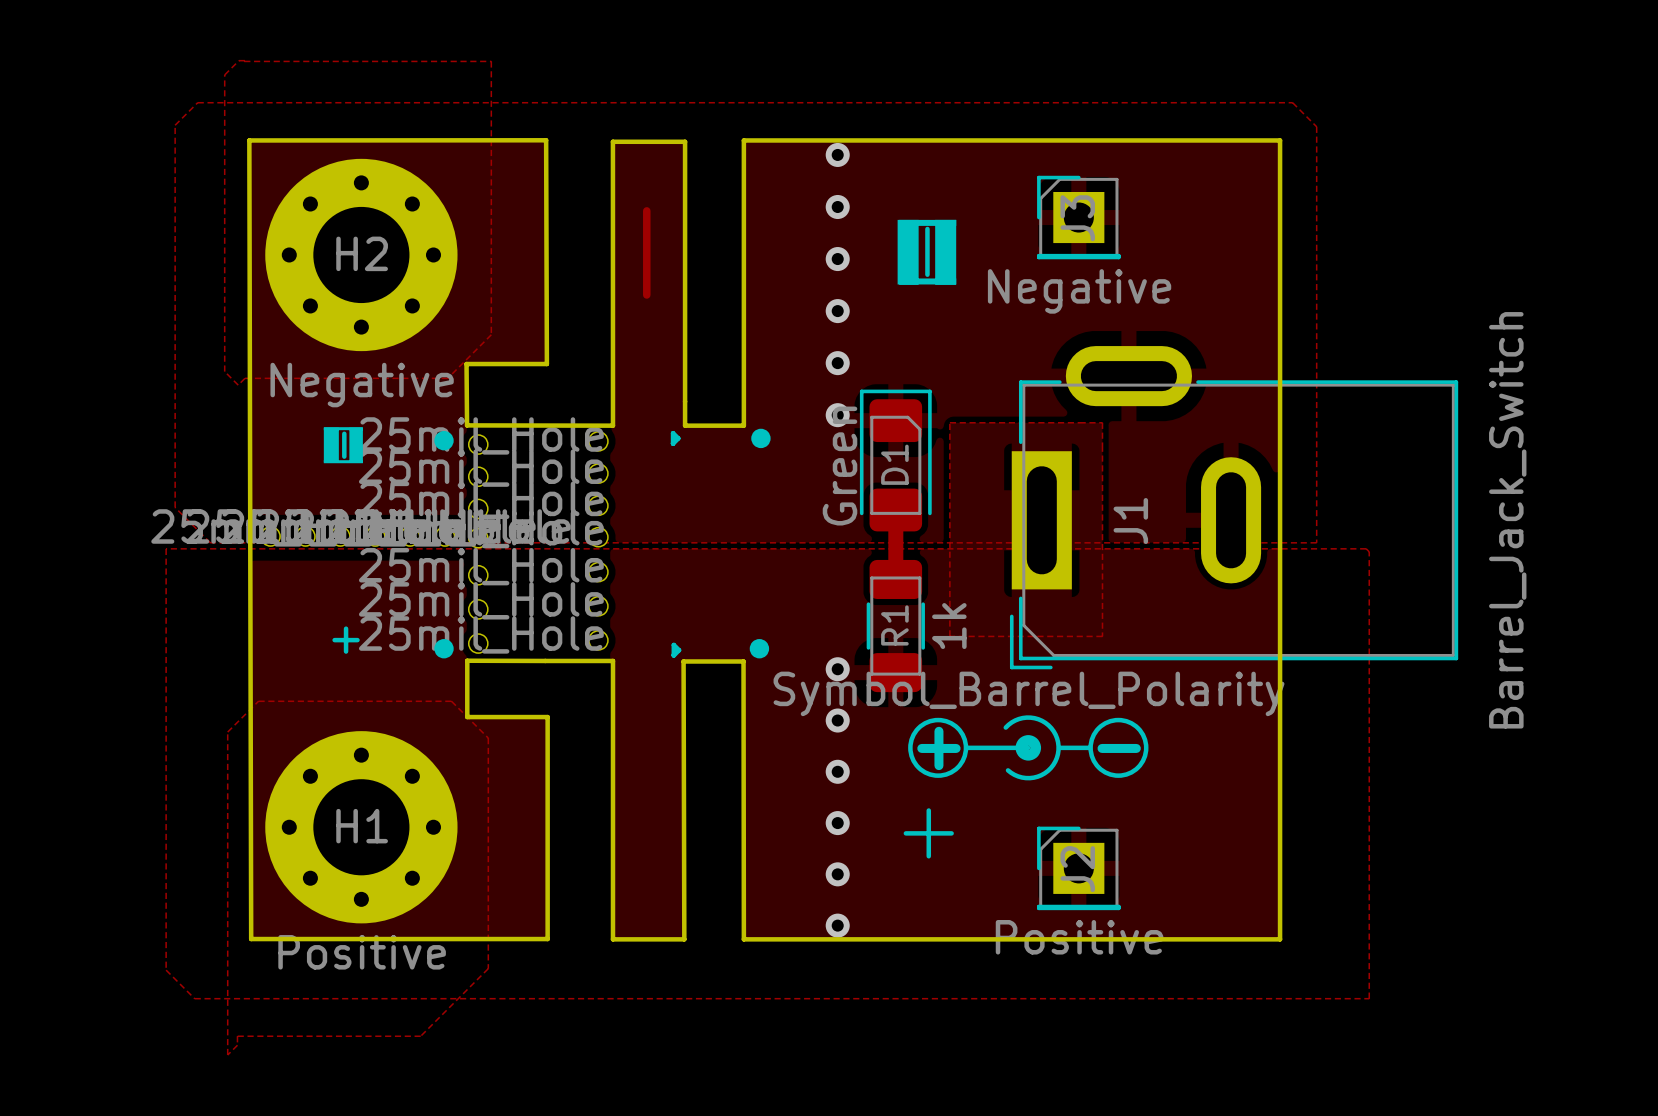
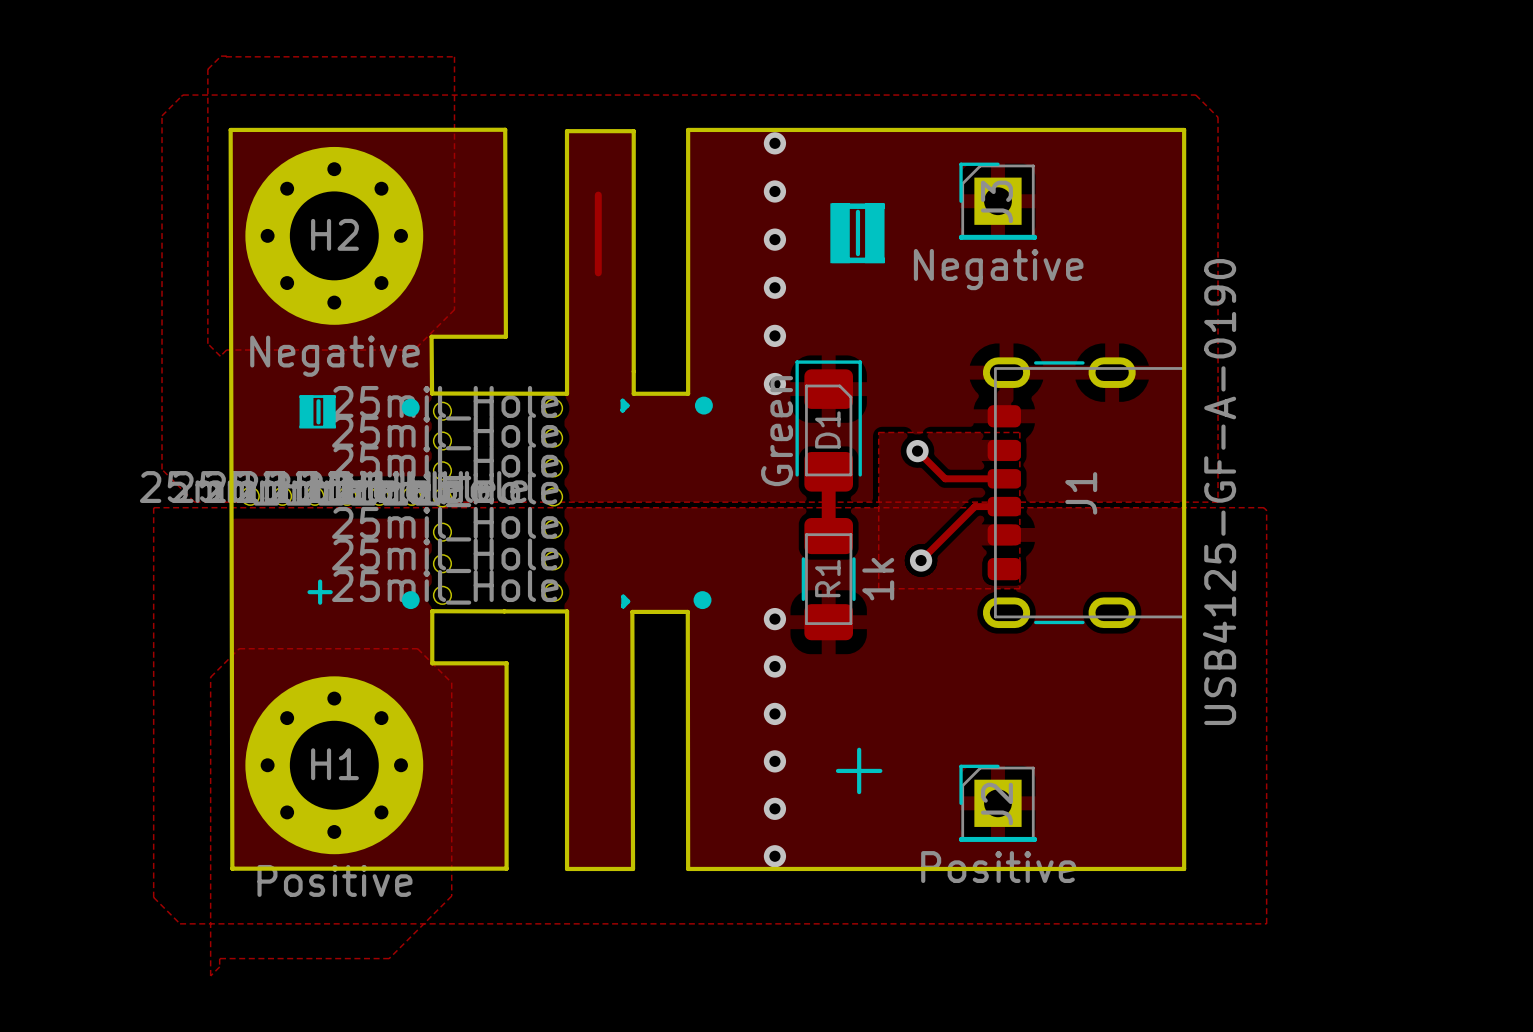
J1 footprint: [1009, 346, 1459, 670] -> [982, 357, 1186, 629]
zone outline: (949, 467) (949, 422) (1102, 422) (1102, 467) -> (878, 432) (1019, 432)
track: none -> (917, 451) (945, 478) (1004, 478)
via: none -> (917, 451)
J1 value: Barrel_Jack_Switch (1507, 520) -> USB4125-GF-A-0190 (1219, 492)
J1 name position: J1 (1130, 521) -> J1 (1081, 493)
track: none -> (1004, 506) (974, 506) (921, 560)
via: none -> (921, 560)
drawing: [908, 715, 1149, 781] -> none
text: + (938, 748) -> none
text: - (1119, 748) -> none

